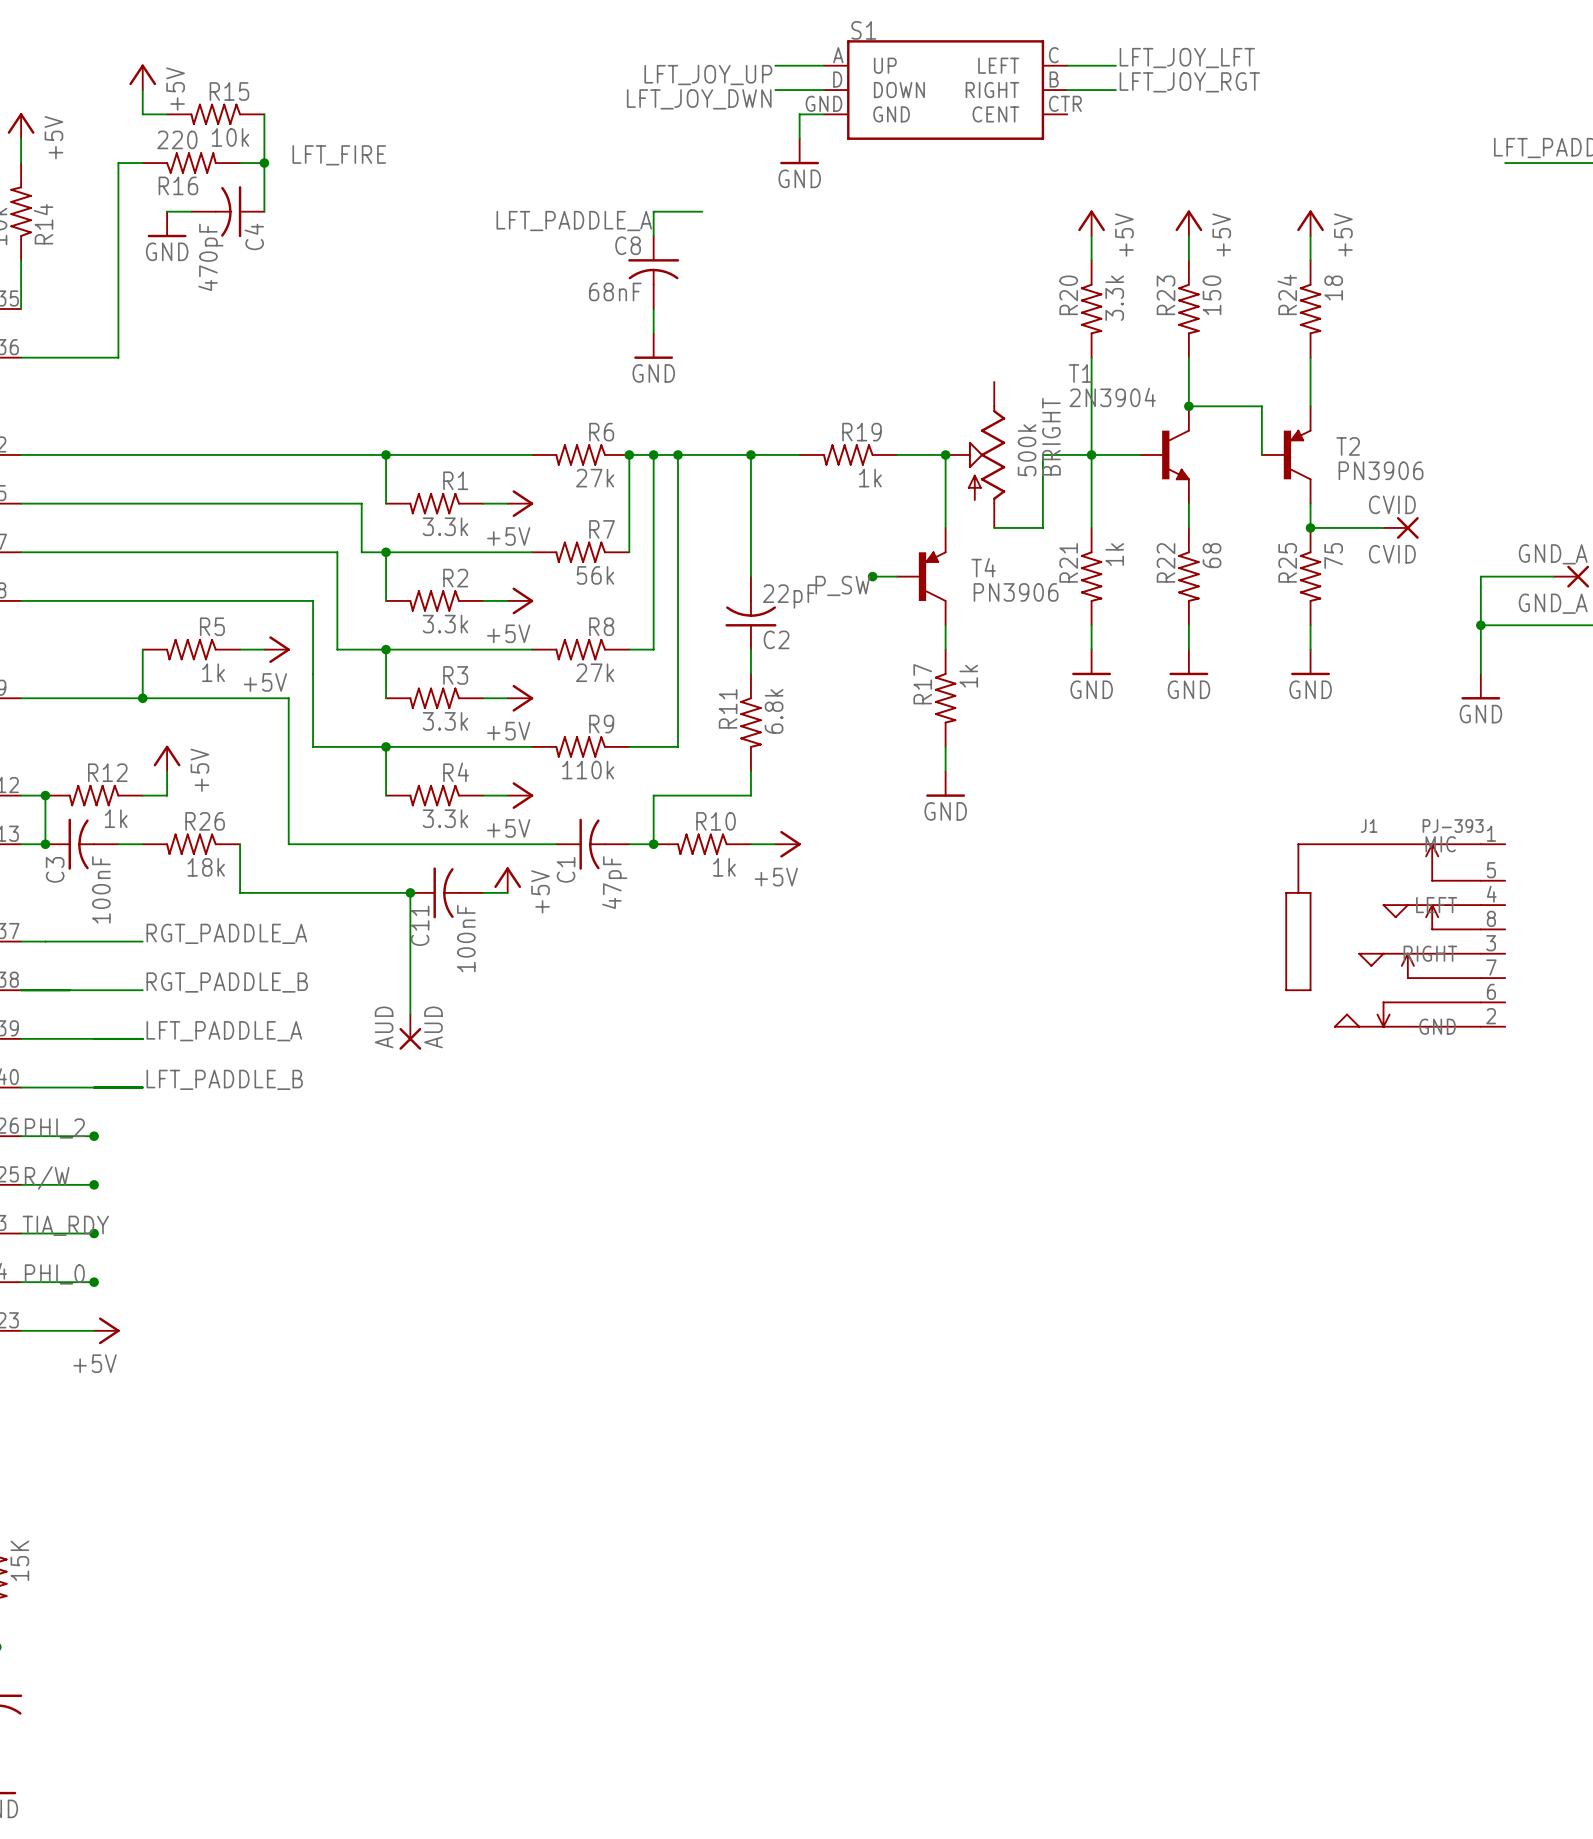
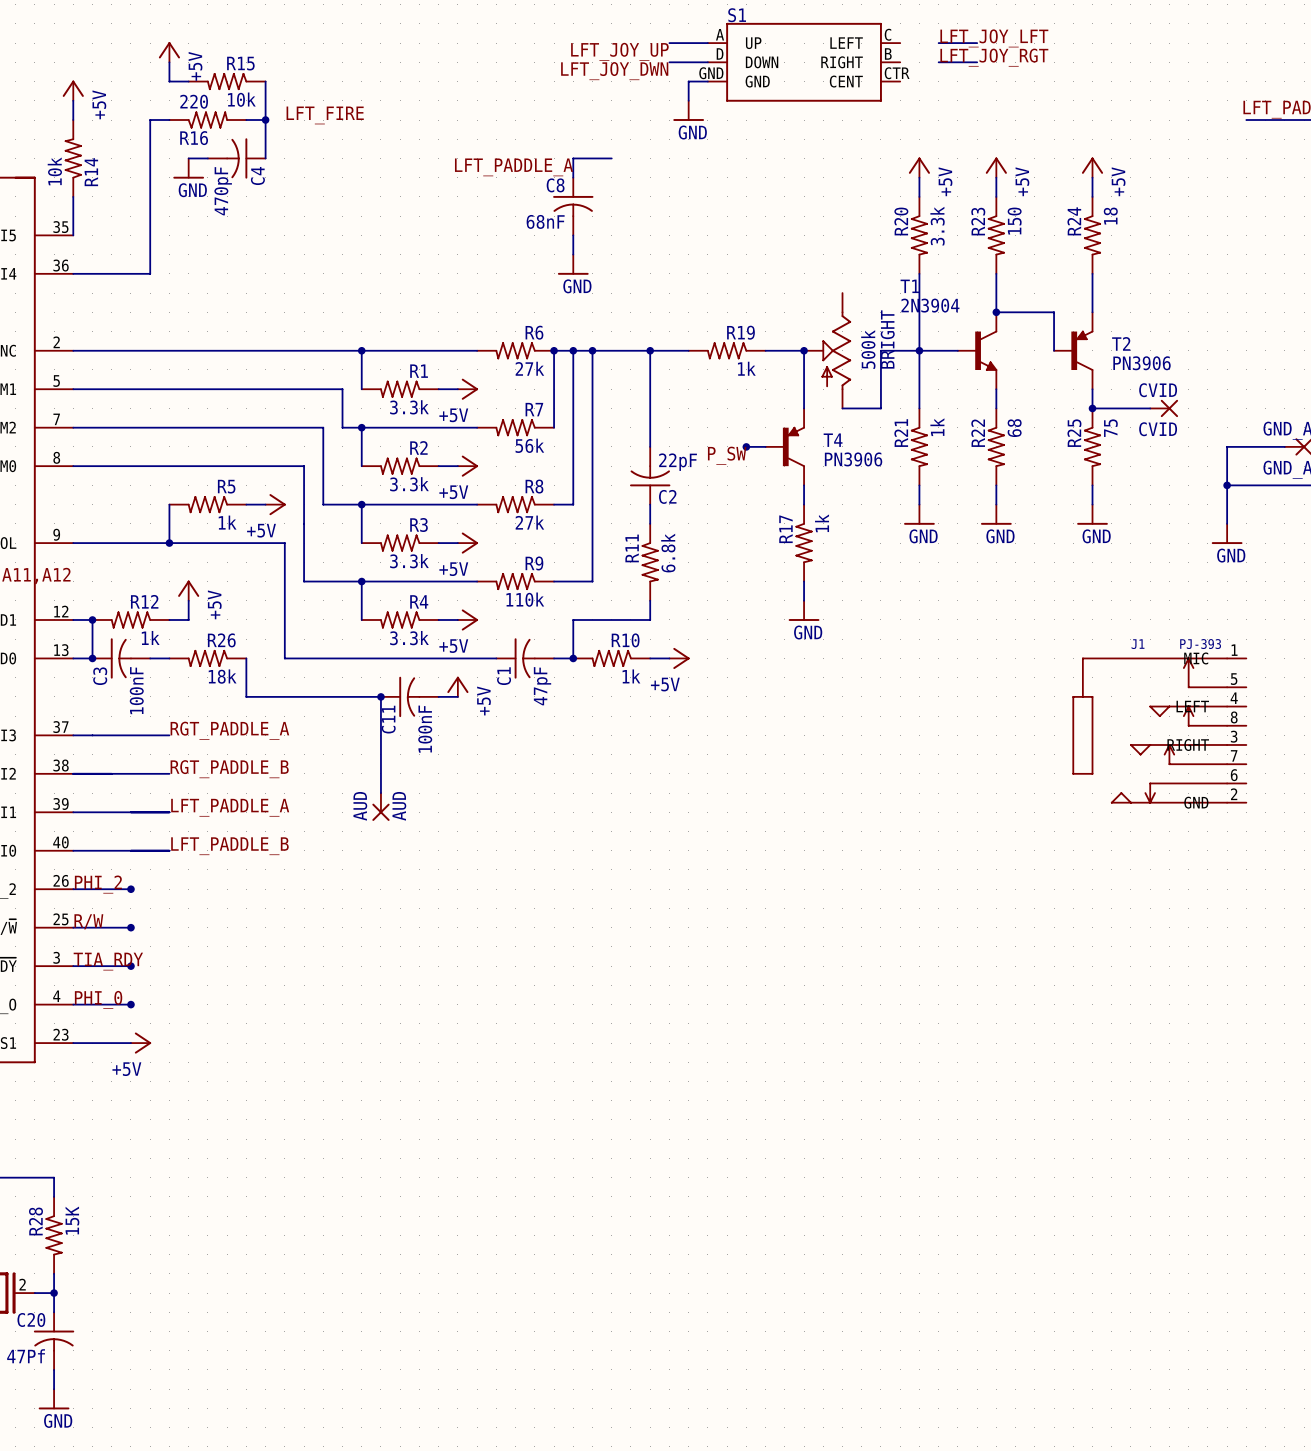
wire: (1067, 65) (1115, 65) -> (977, 43) (938, 43)
wire: (1067, 90) (1115, 90) -> (977, 62) (938, 62)

